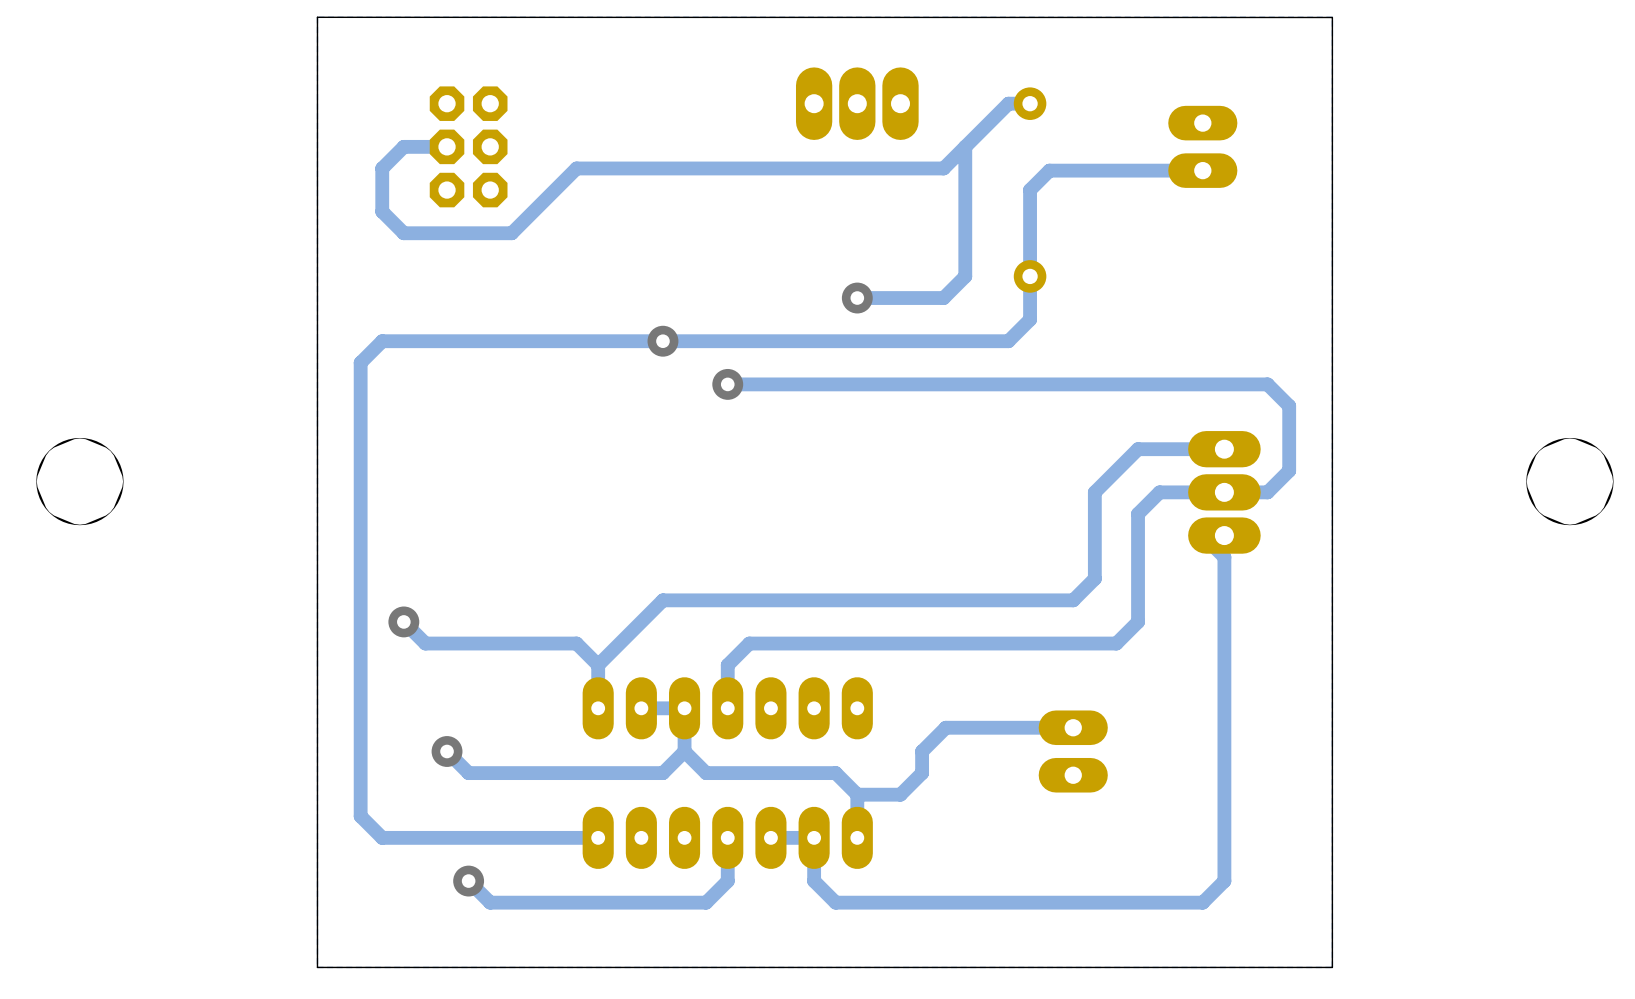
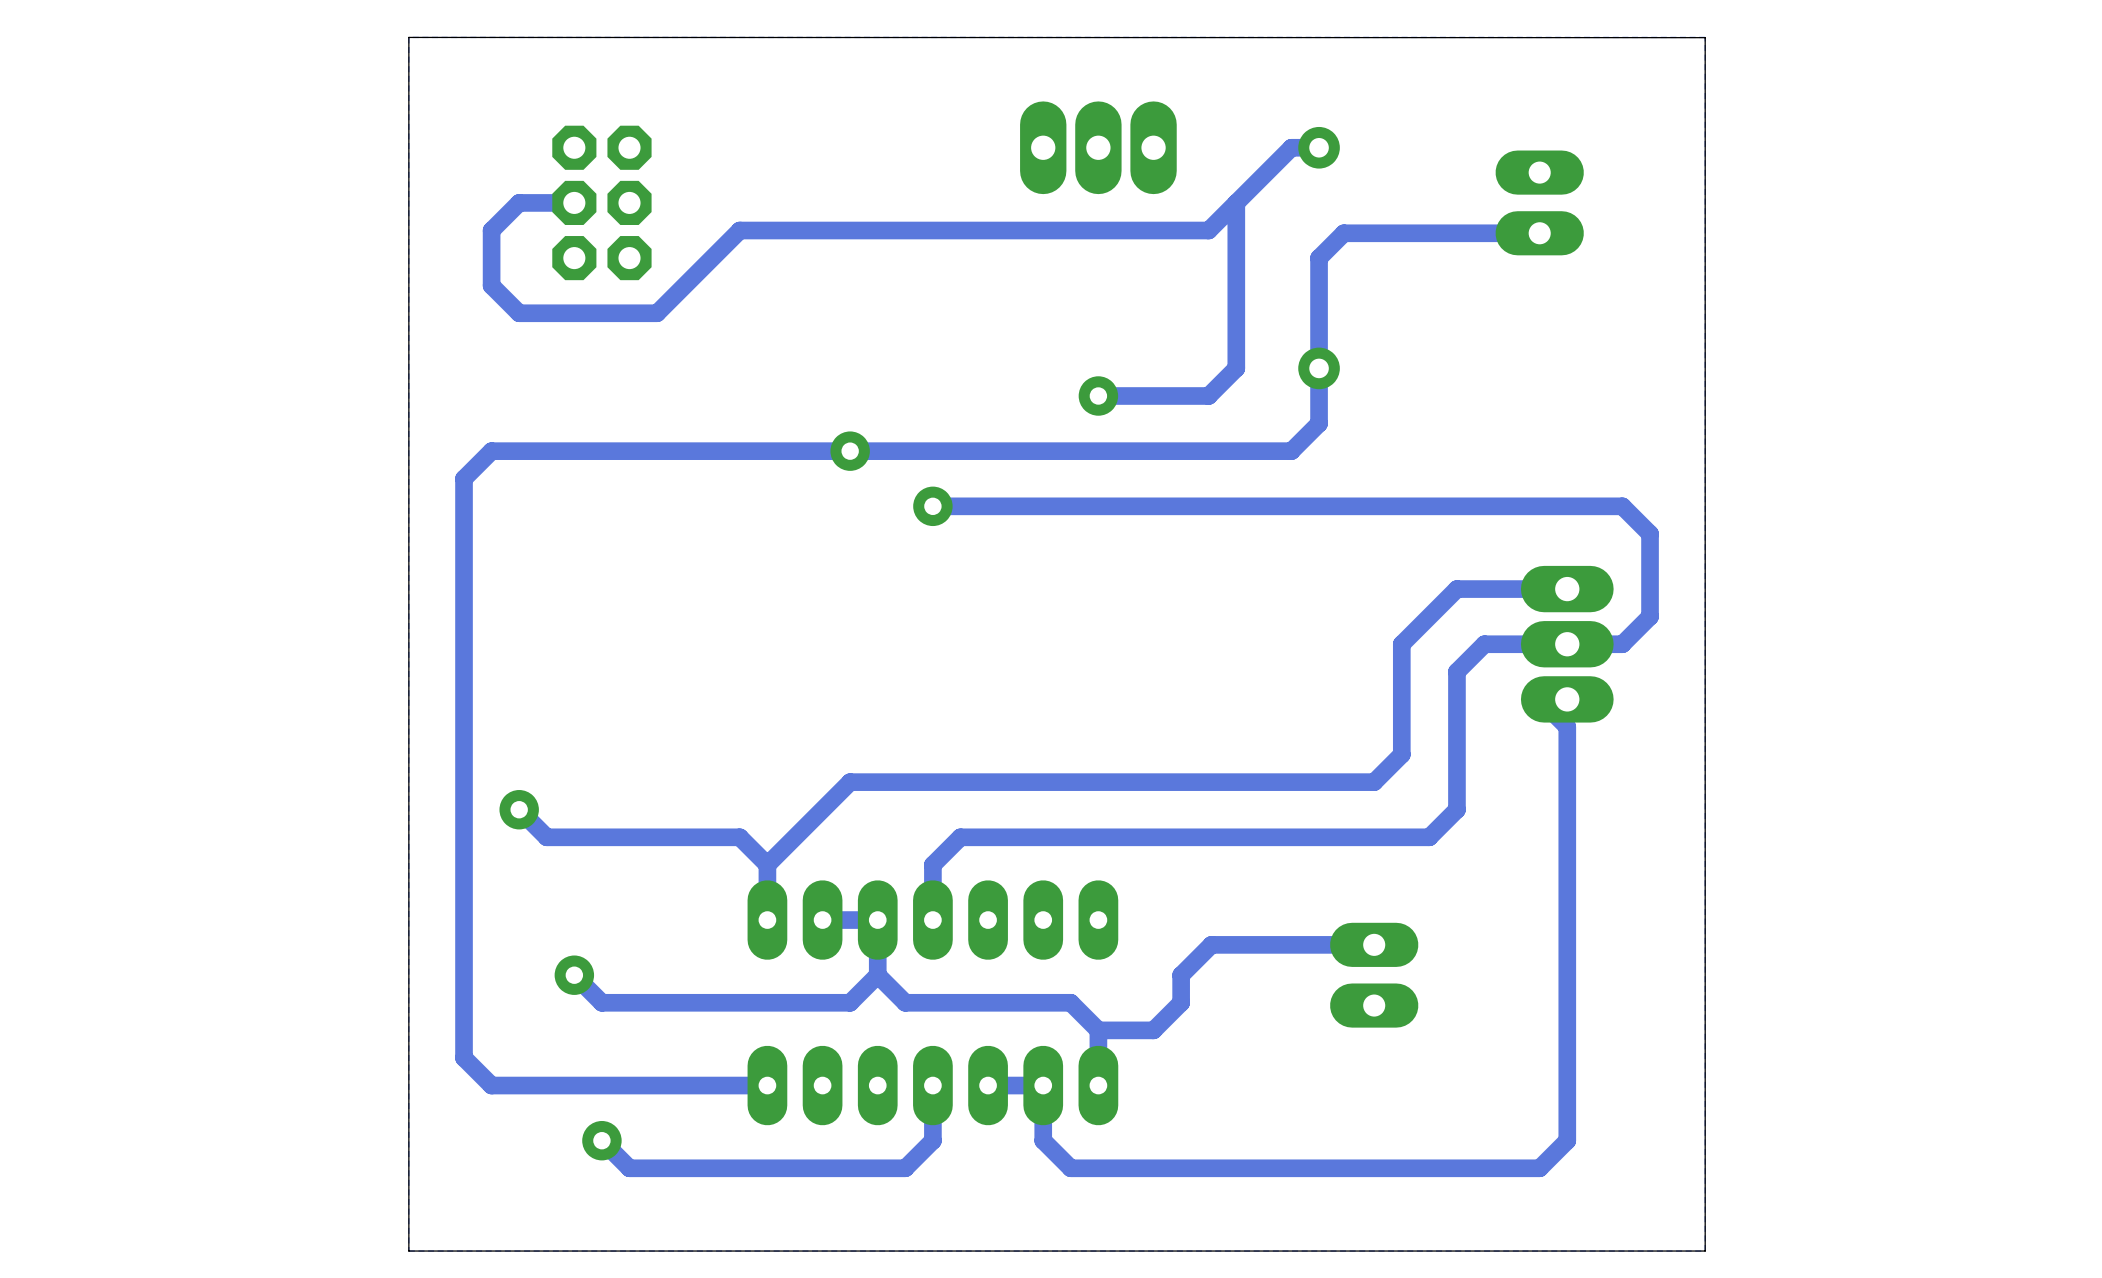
round board edge: [36, 437, 124, 526] -> none
round board edge: [1526, 437, 1614, 526] -> none

